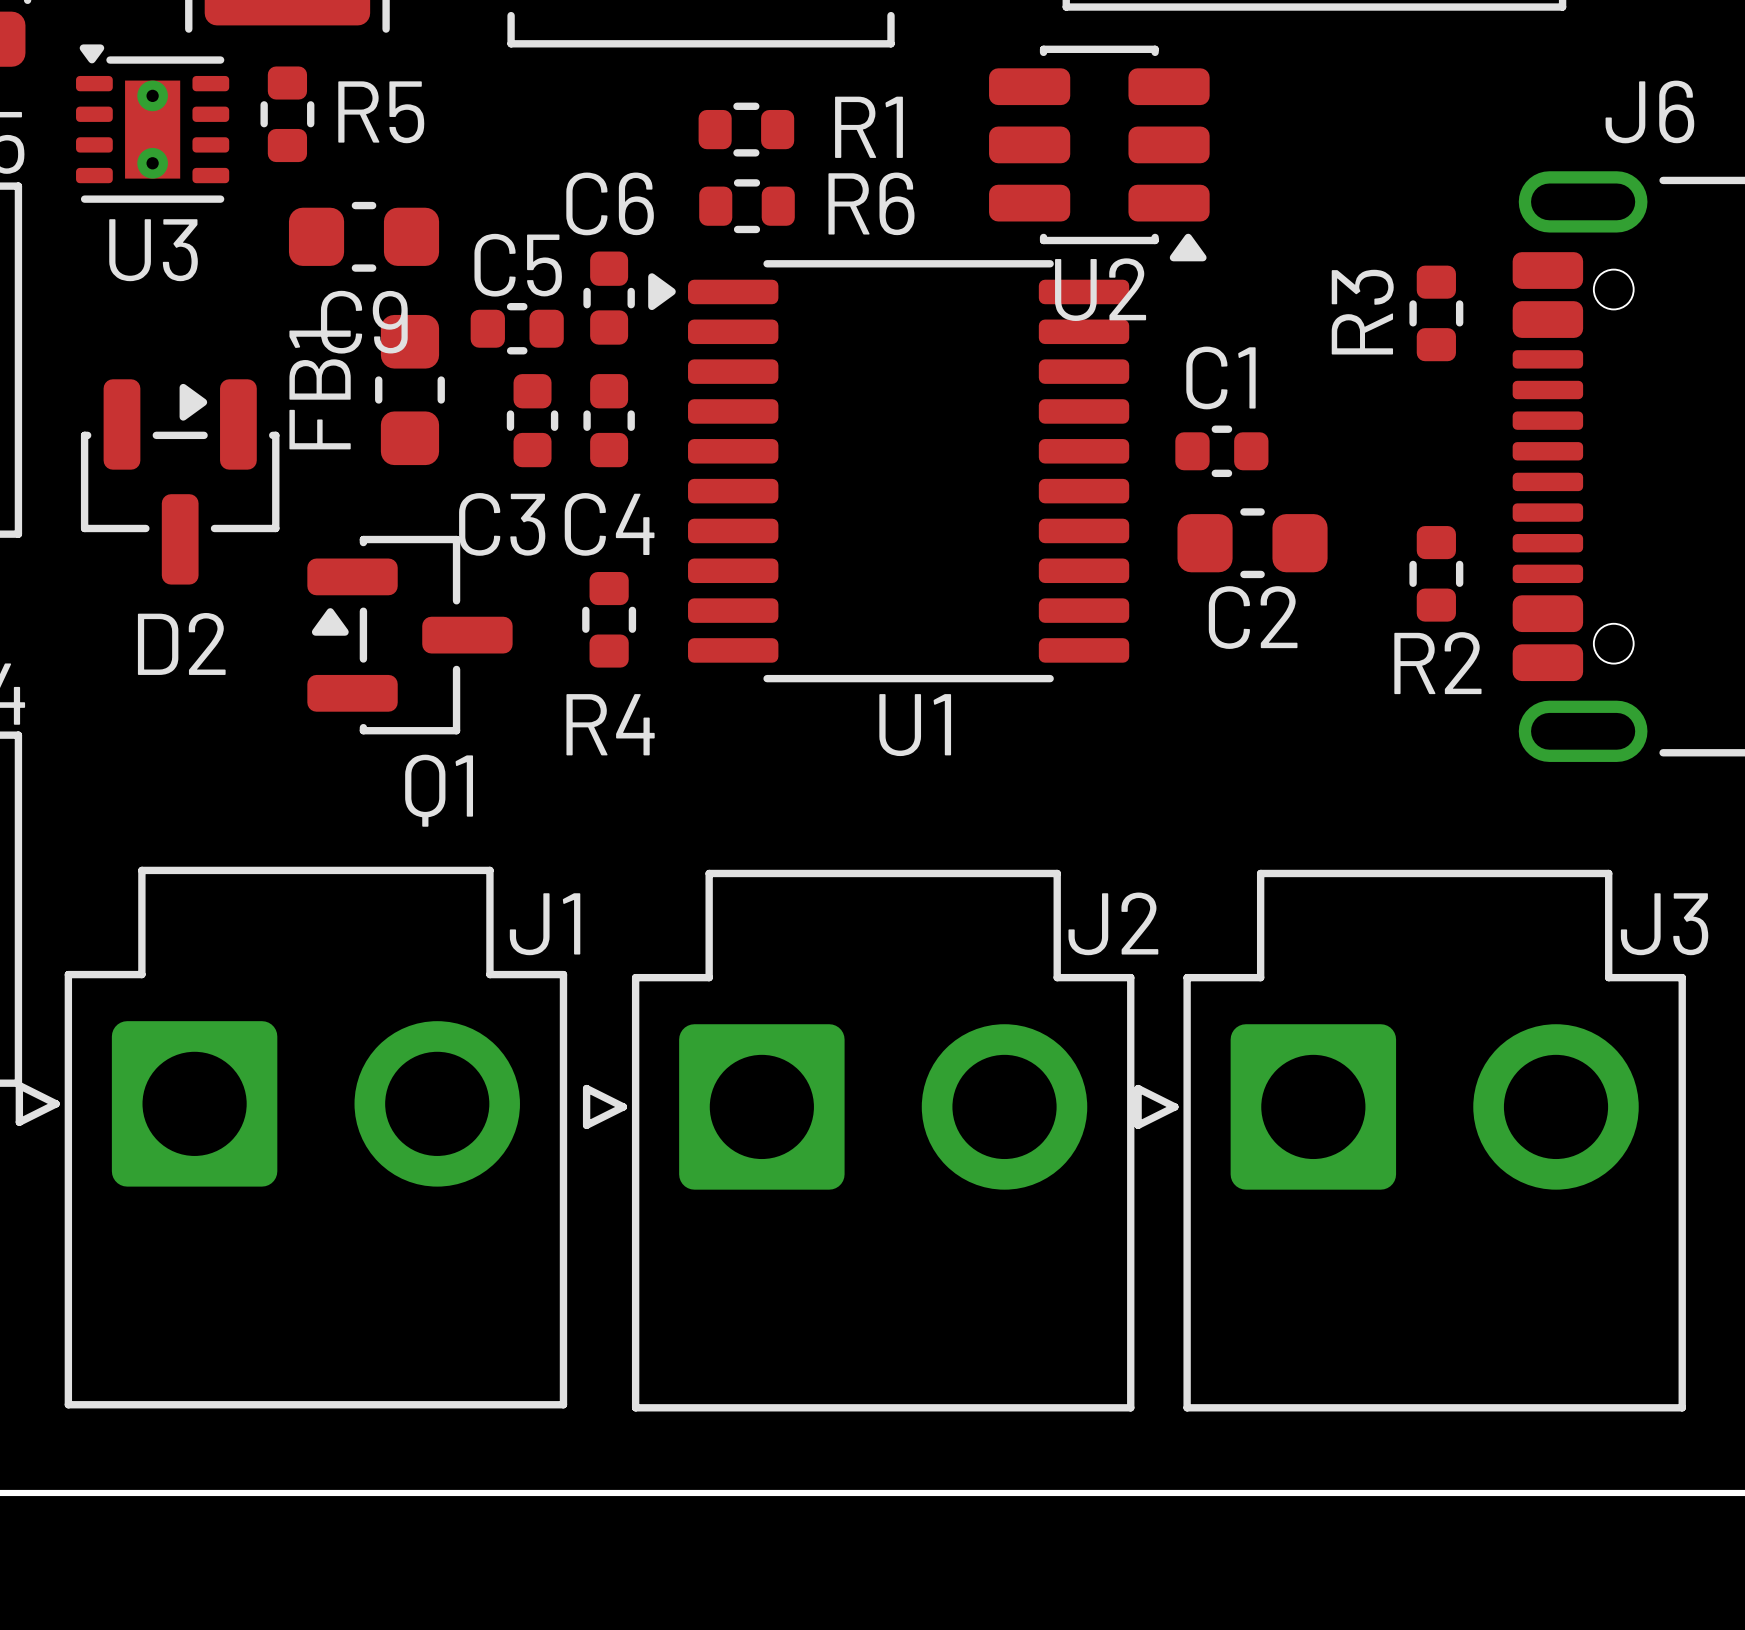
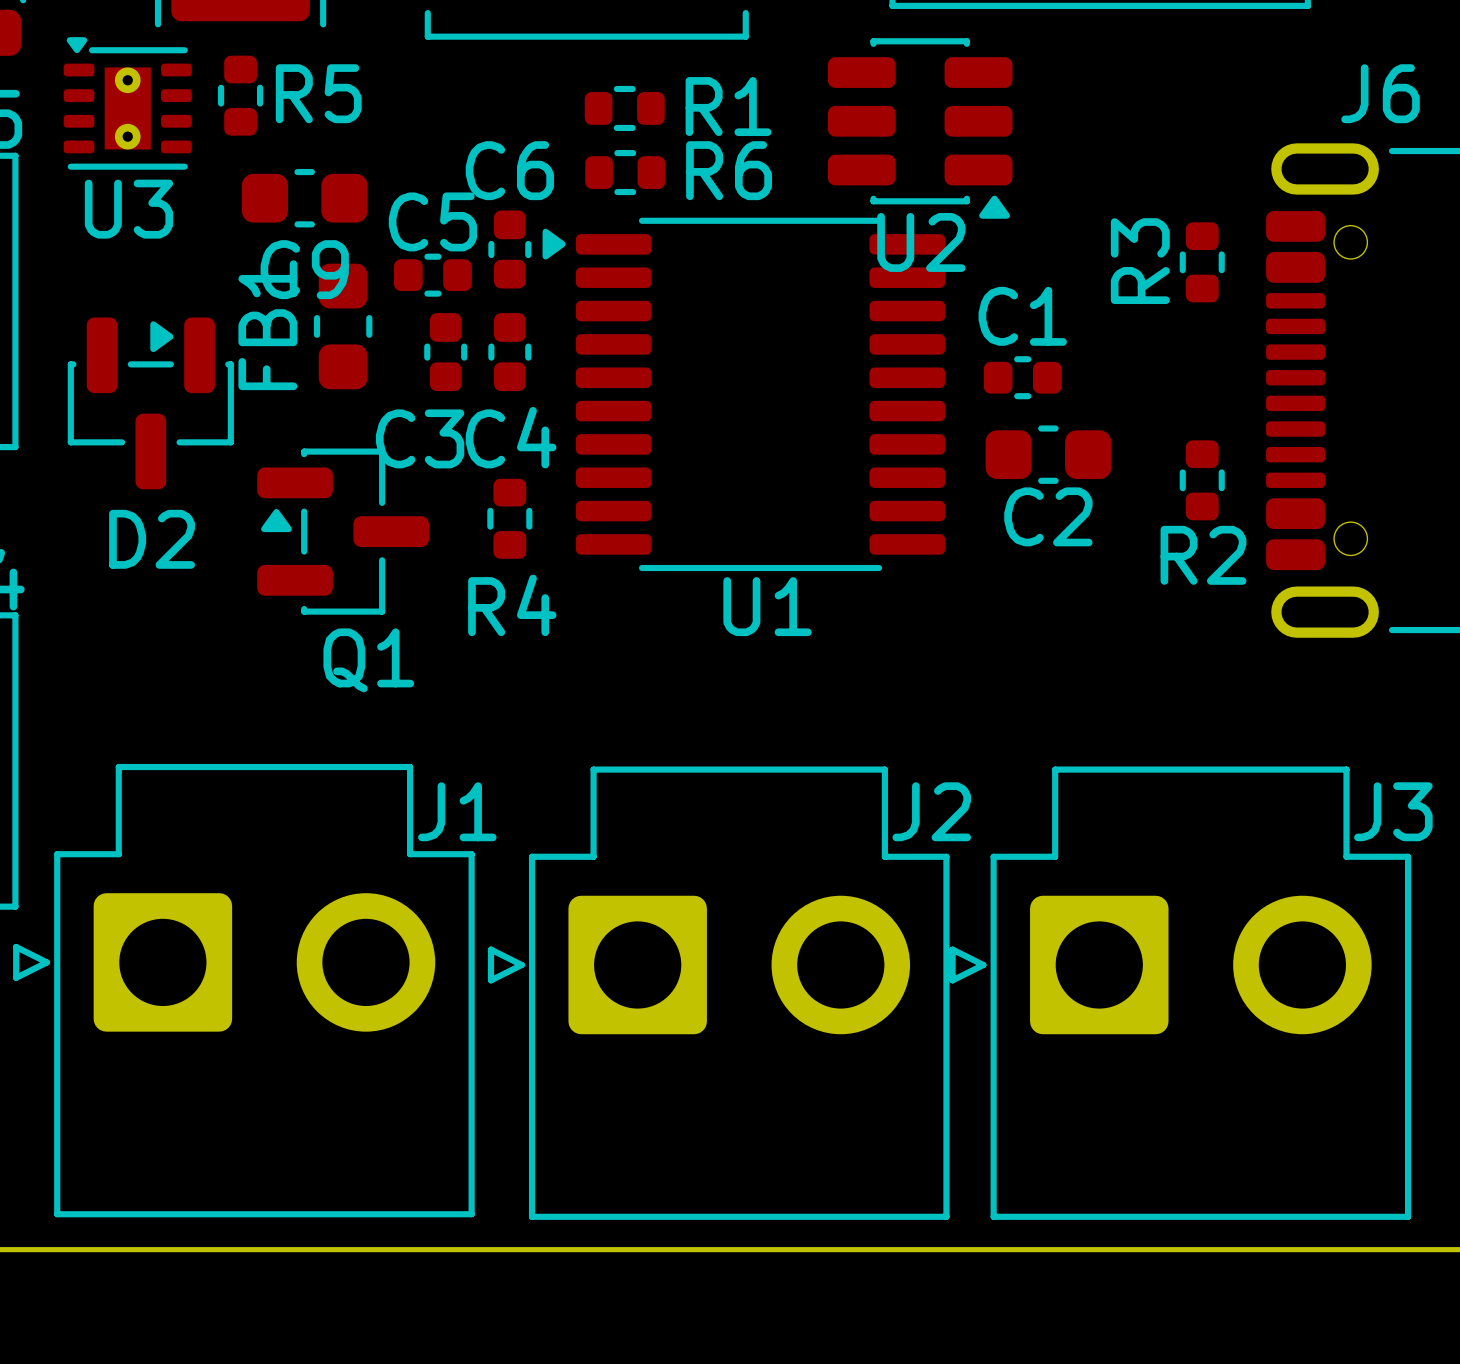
J1 position: (291, 1137) -> (243, 990)
J2 position: (858, 1140) -> (718, 993)
J3 position: (1410, 1140) -> (1180, 993)

